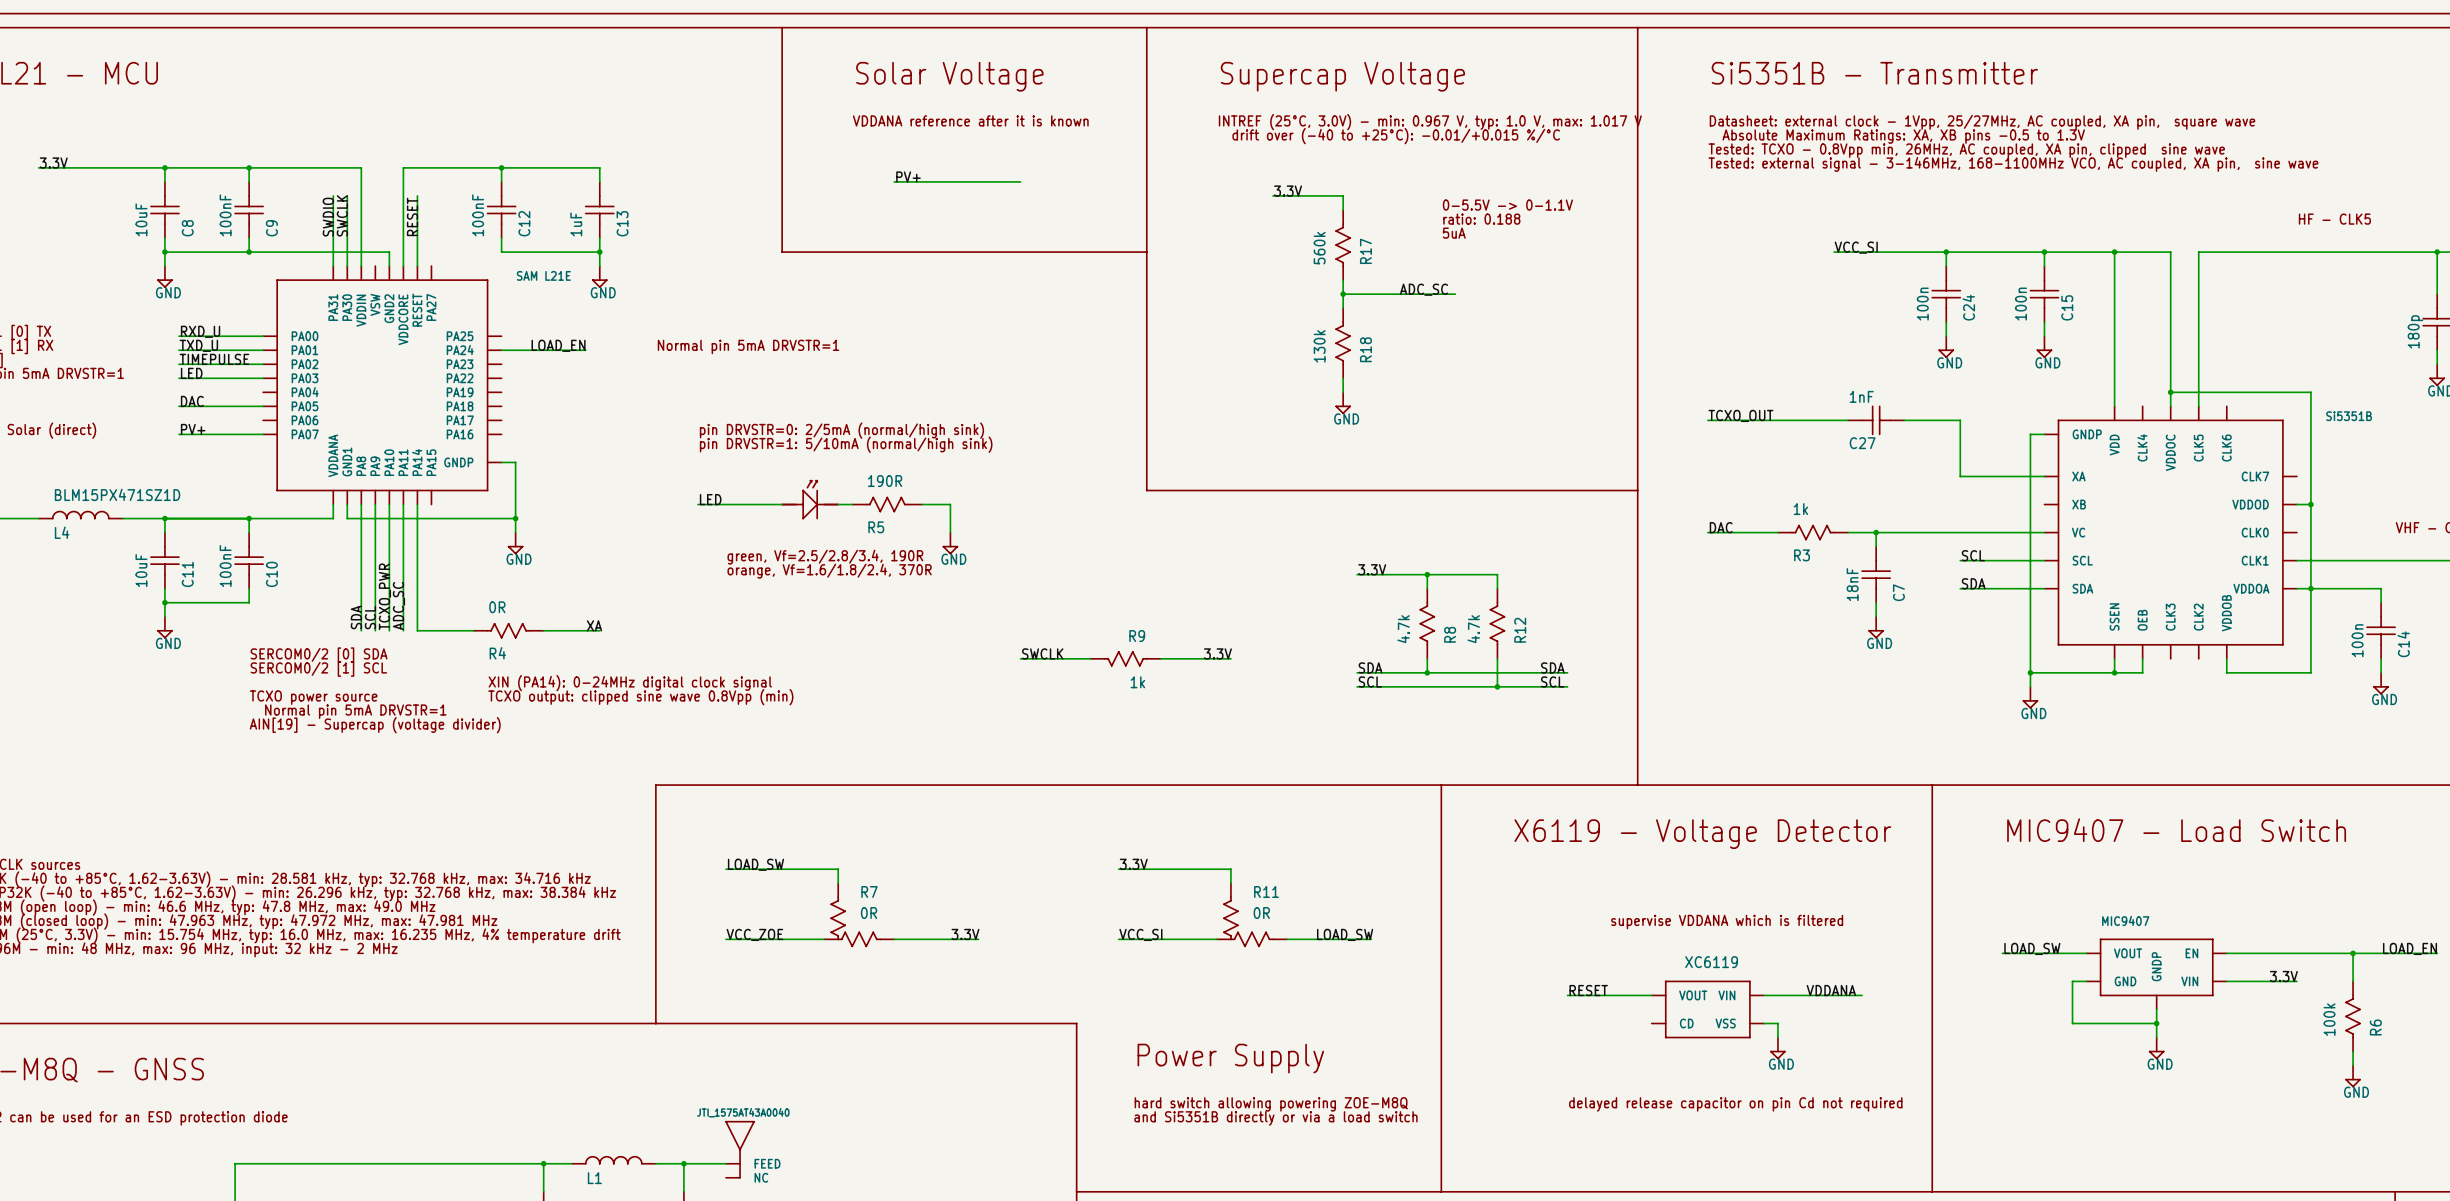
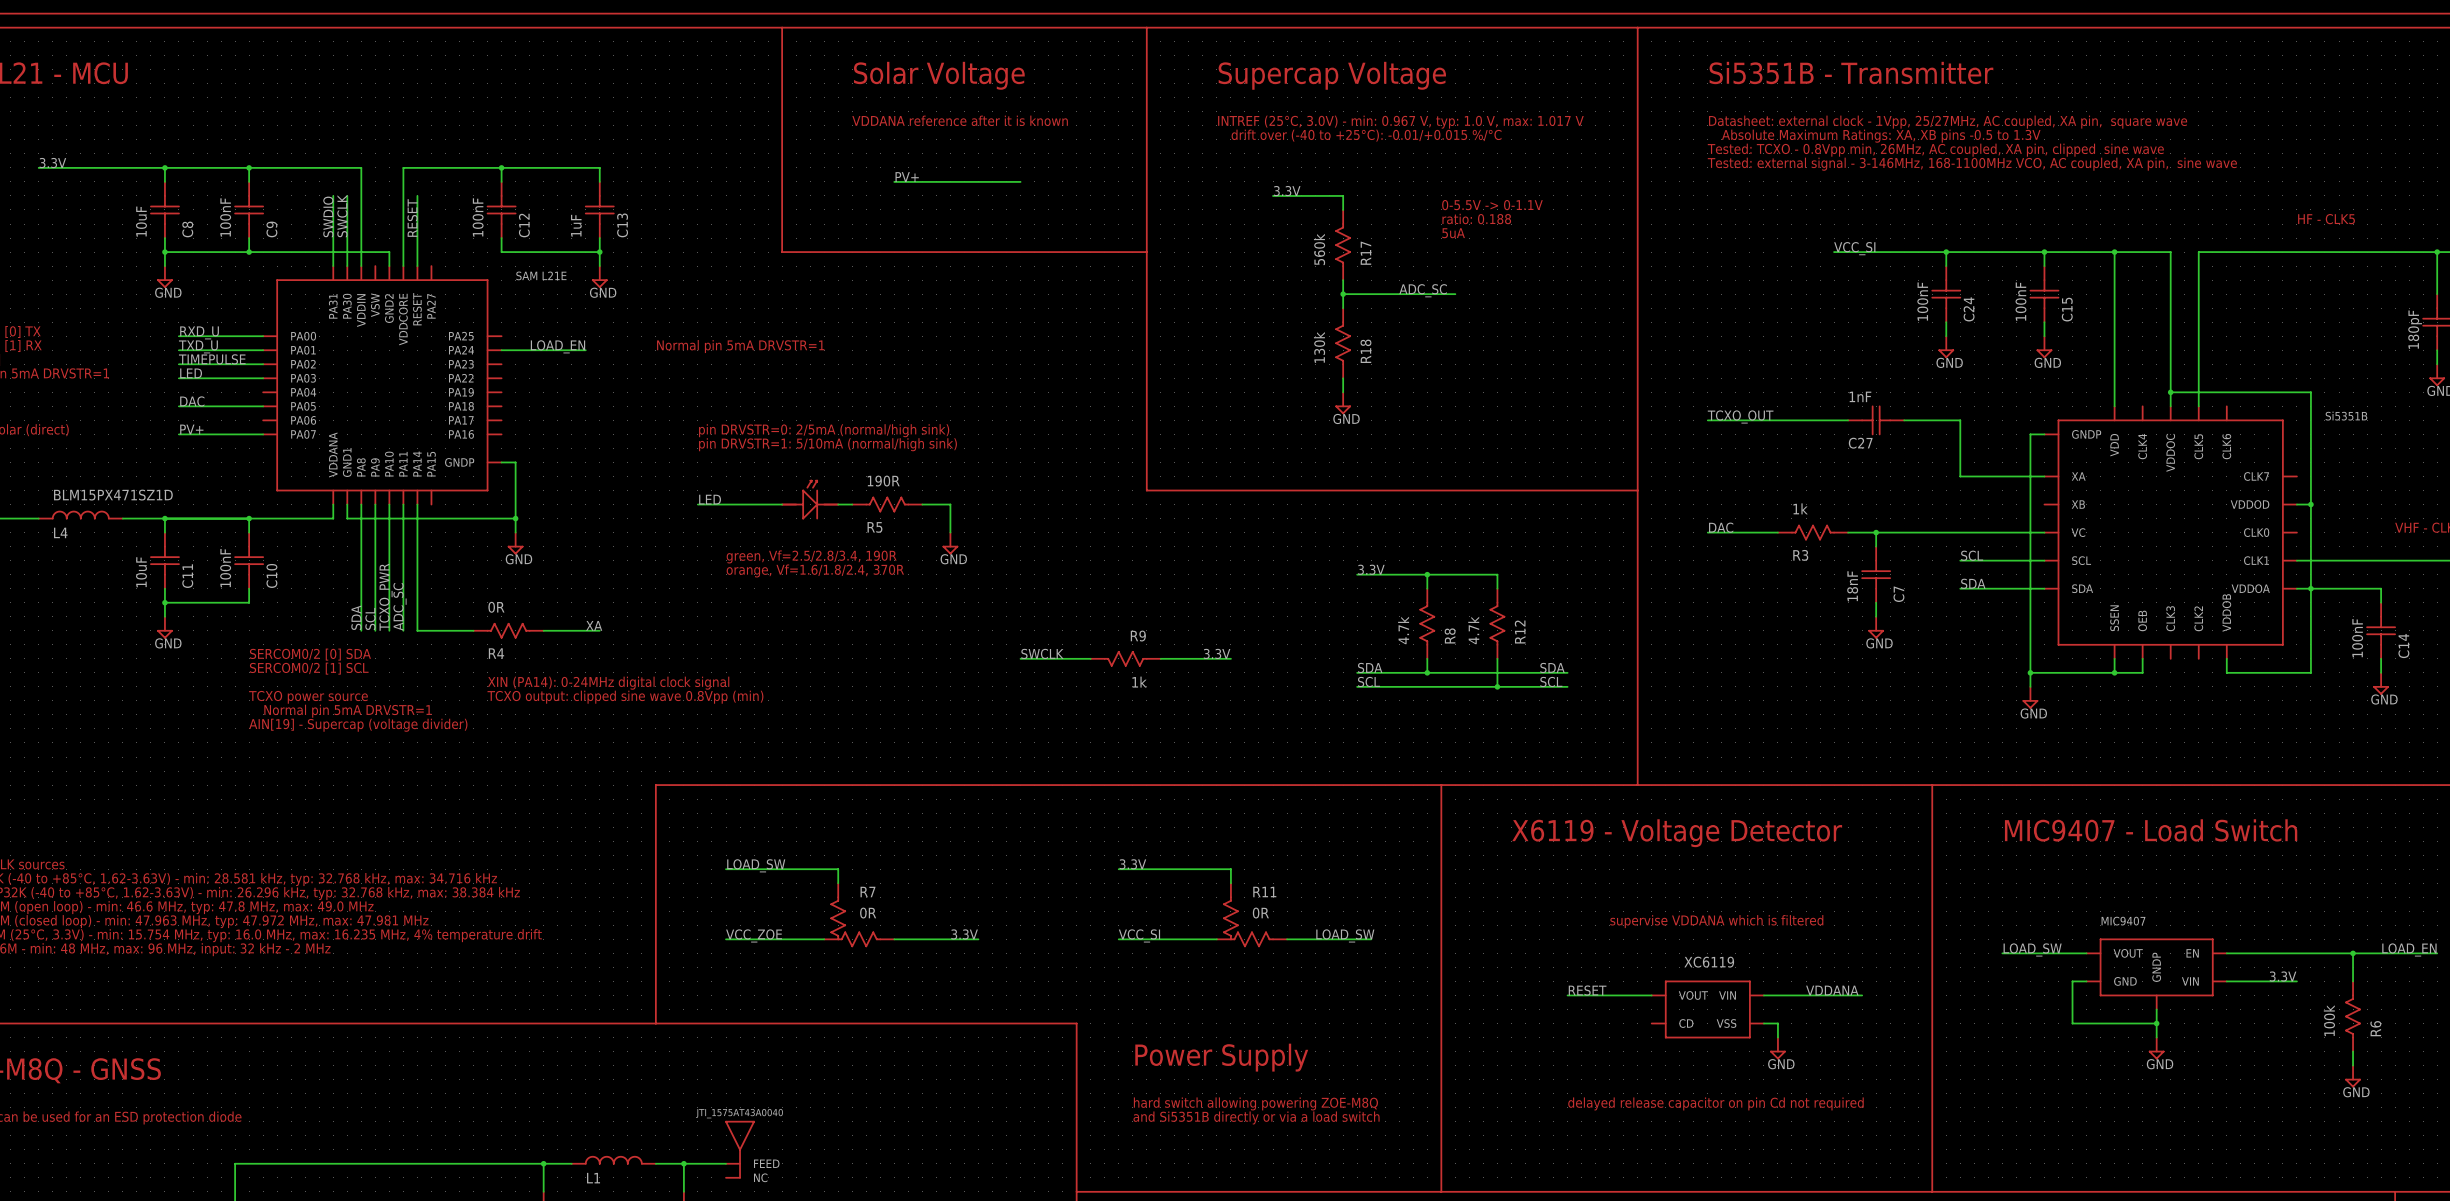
C24 value: 100n (1922, 304) -> 100nF (1922, 301)
C15 value: 100n (2020, 304) -> 100nF (2020, 301)
part value: 180p (2415, 331) -> 180pF (2415, 329)
C14 value: 100n (2357, 640) -> 100nF (2357, 638)

